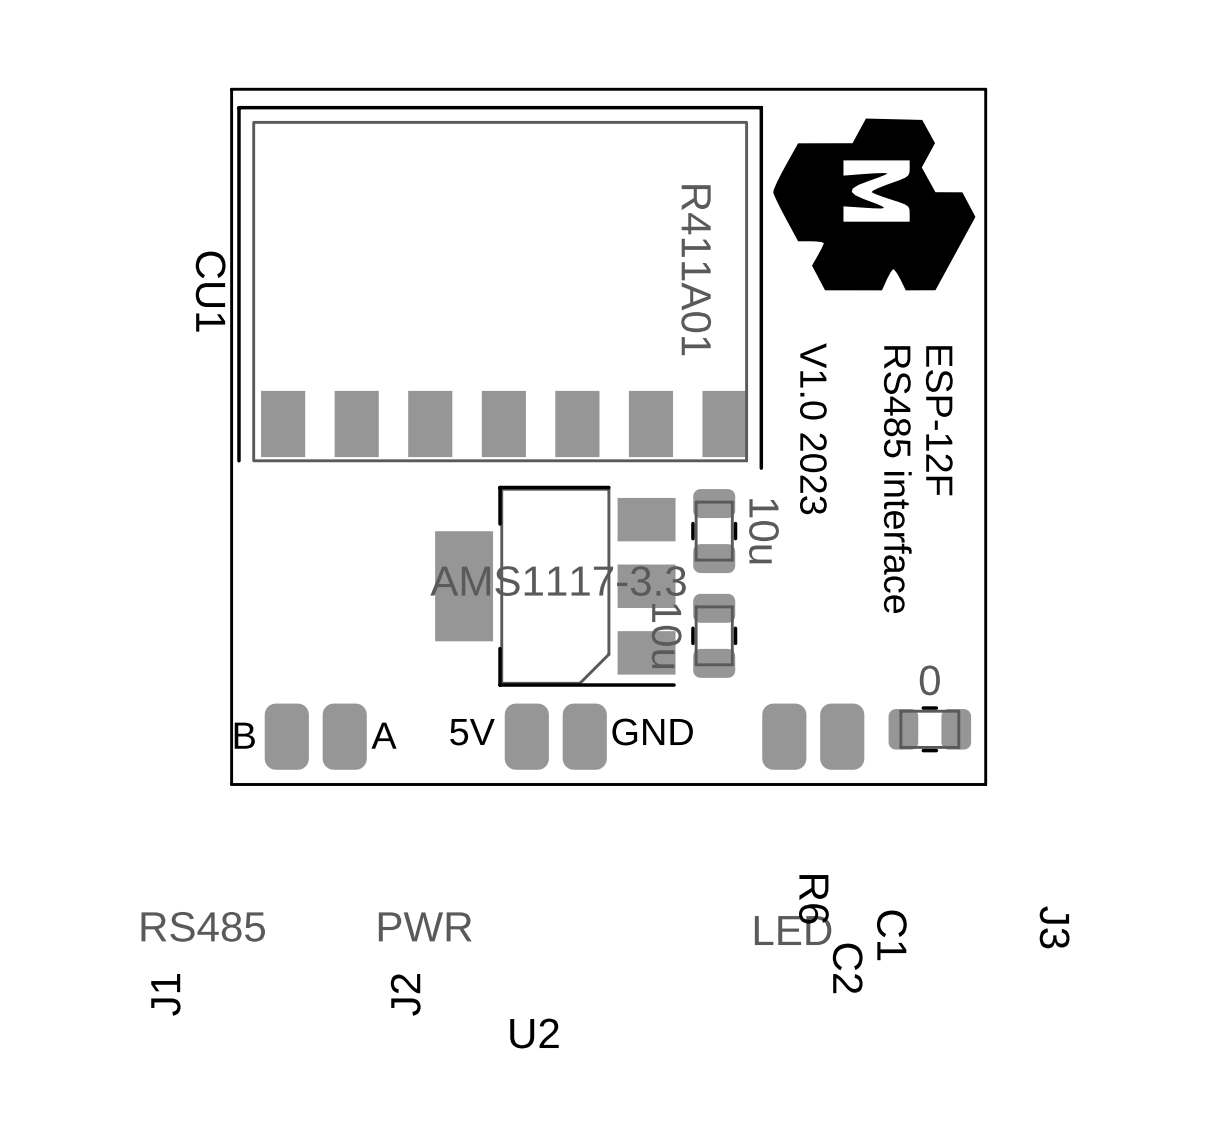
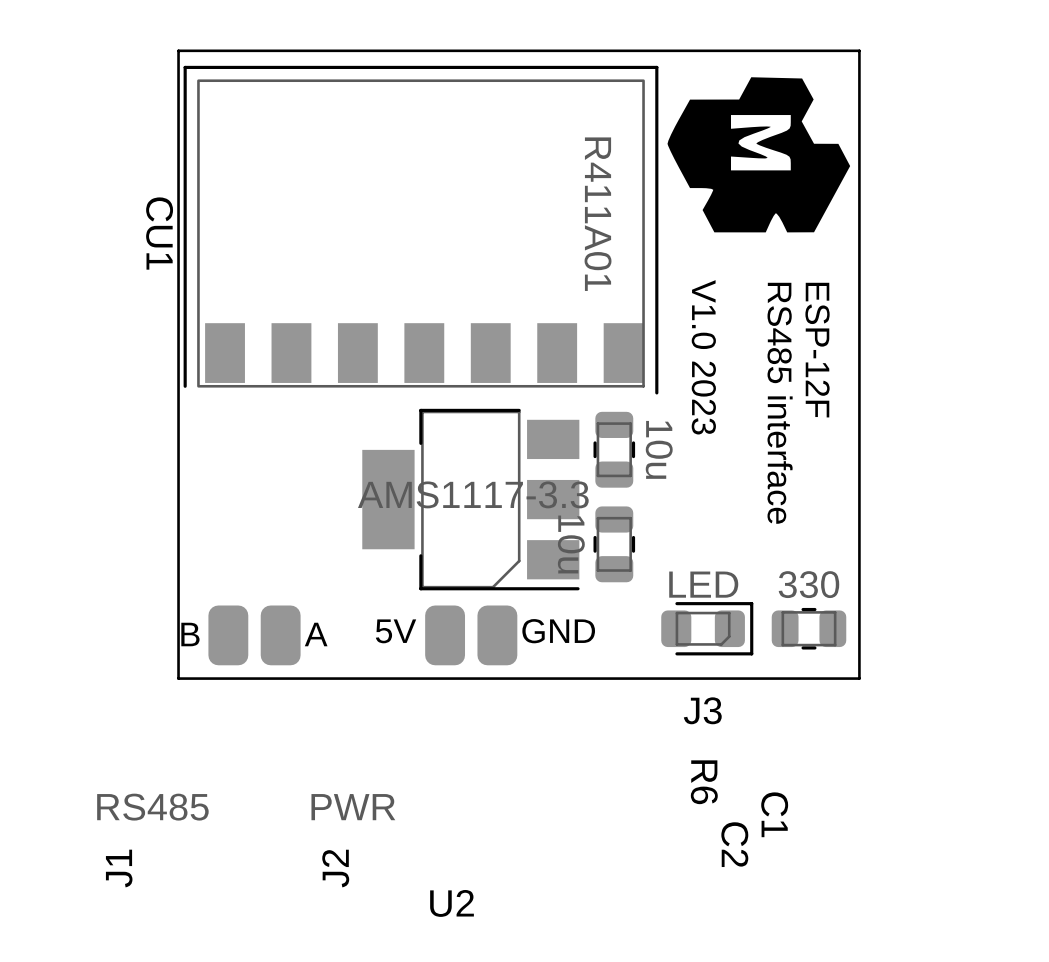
R6 value: 0 (929, 680) -> 330 (808, 584)
J3 footprint: [762, 703, 865, 770] -> [661, 602, 754, 656]
J3 name position: J3 (1054, 927) -> J3 (702, 710)
J3 value position: LED (793, 930) -> LED (703, 584)

